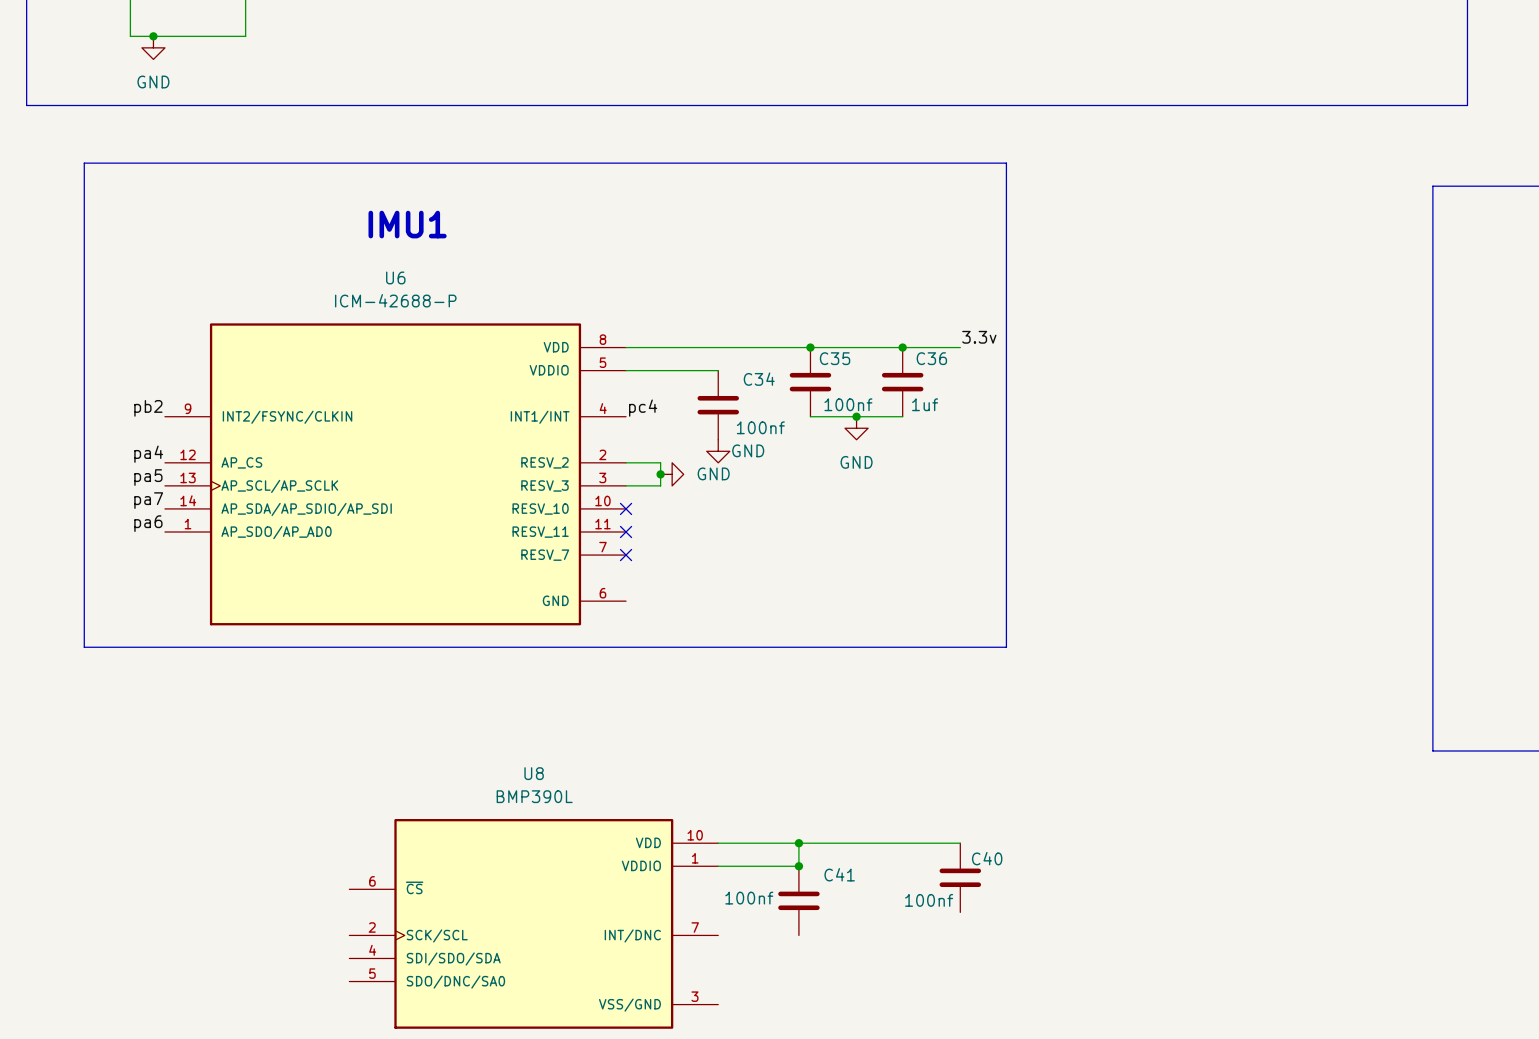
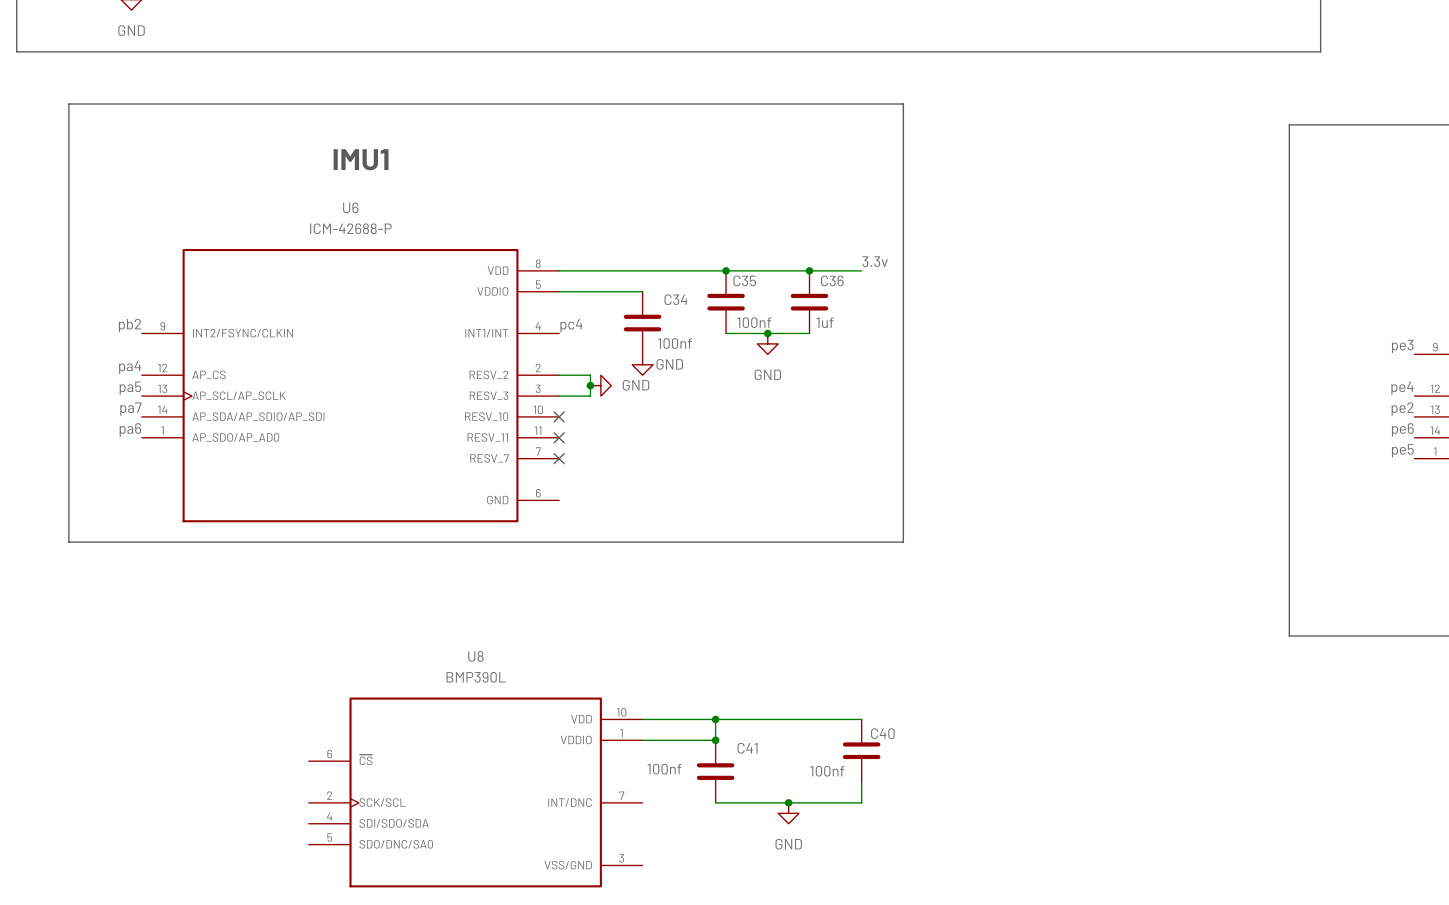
wire: none -> (861, 782) (861, 802) (715, 802)
junction: none -> (788, 802)
power symbol: none -> GND (788, 813)

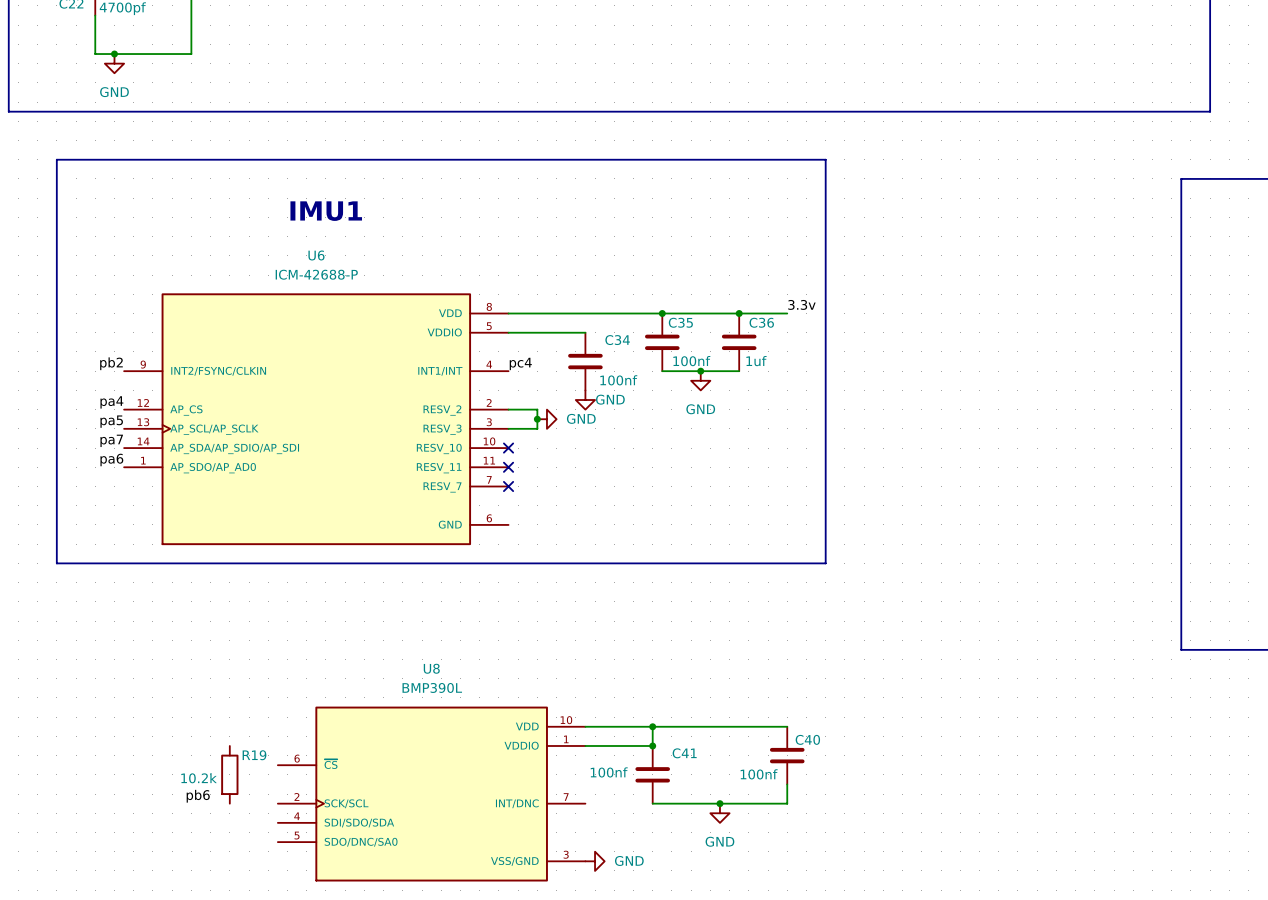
R19: none -> 10.2k (229, 774)
label: none -> pb6 (198, 796)
power symbol: none -> GND (595, 861)

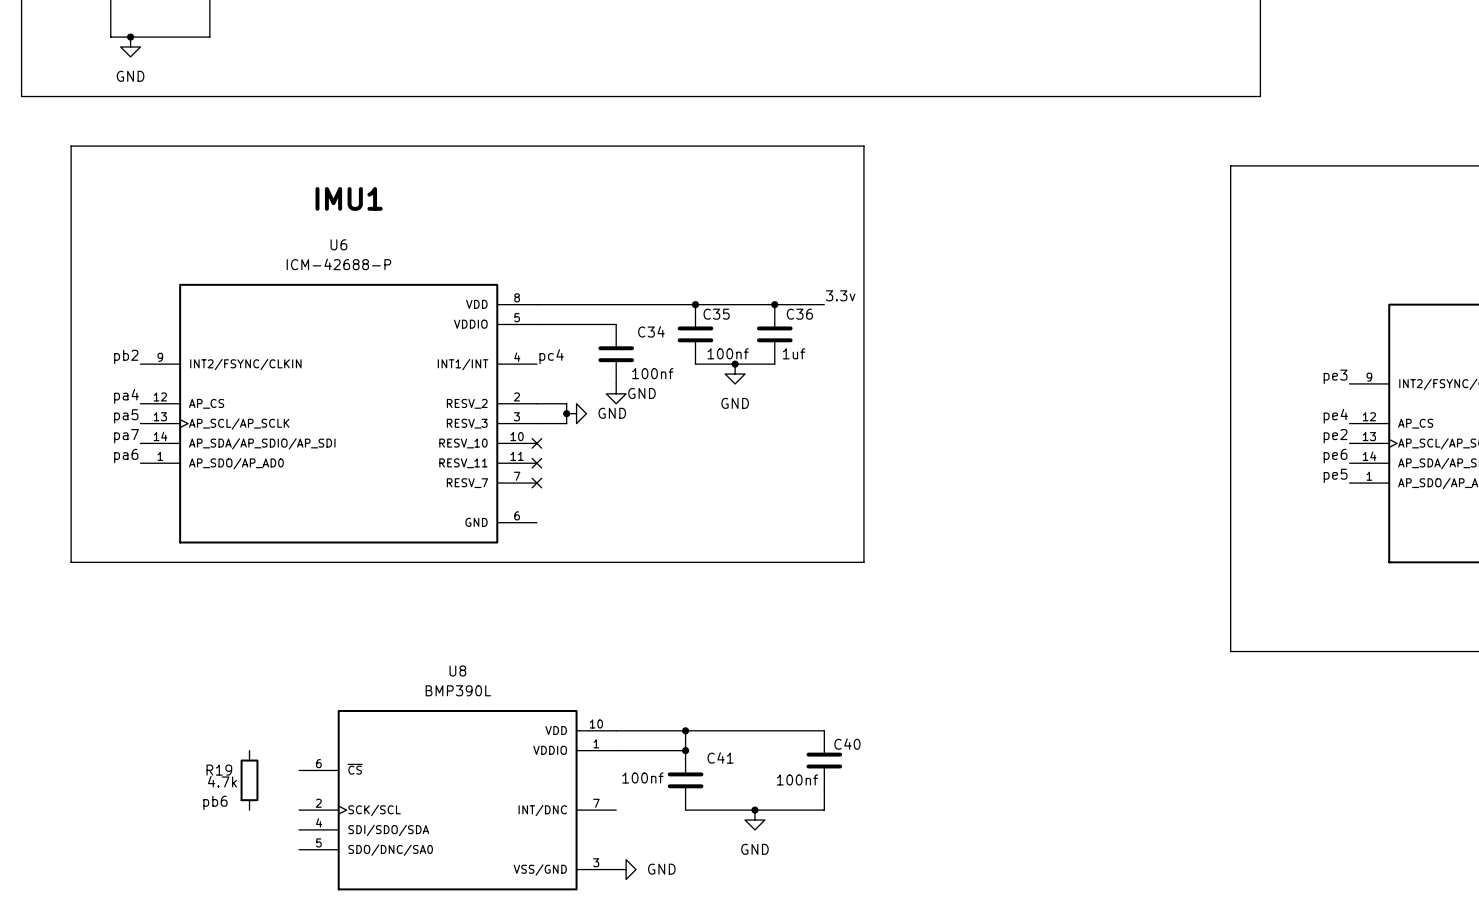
R19 name position: R19 (254, 755) -> R19 (219, 770)
R19 value: 10.2k (199, 778) -> 4.7k (222, 781)

